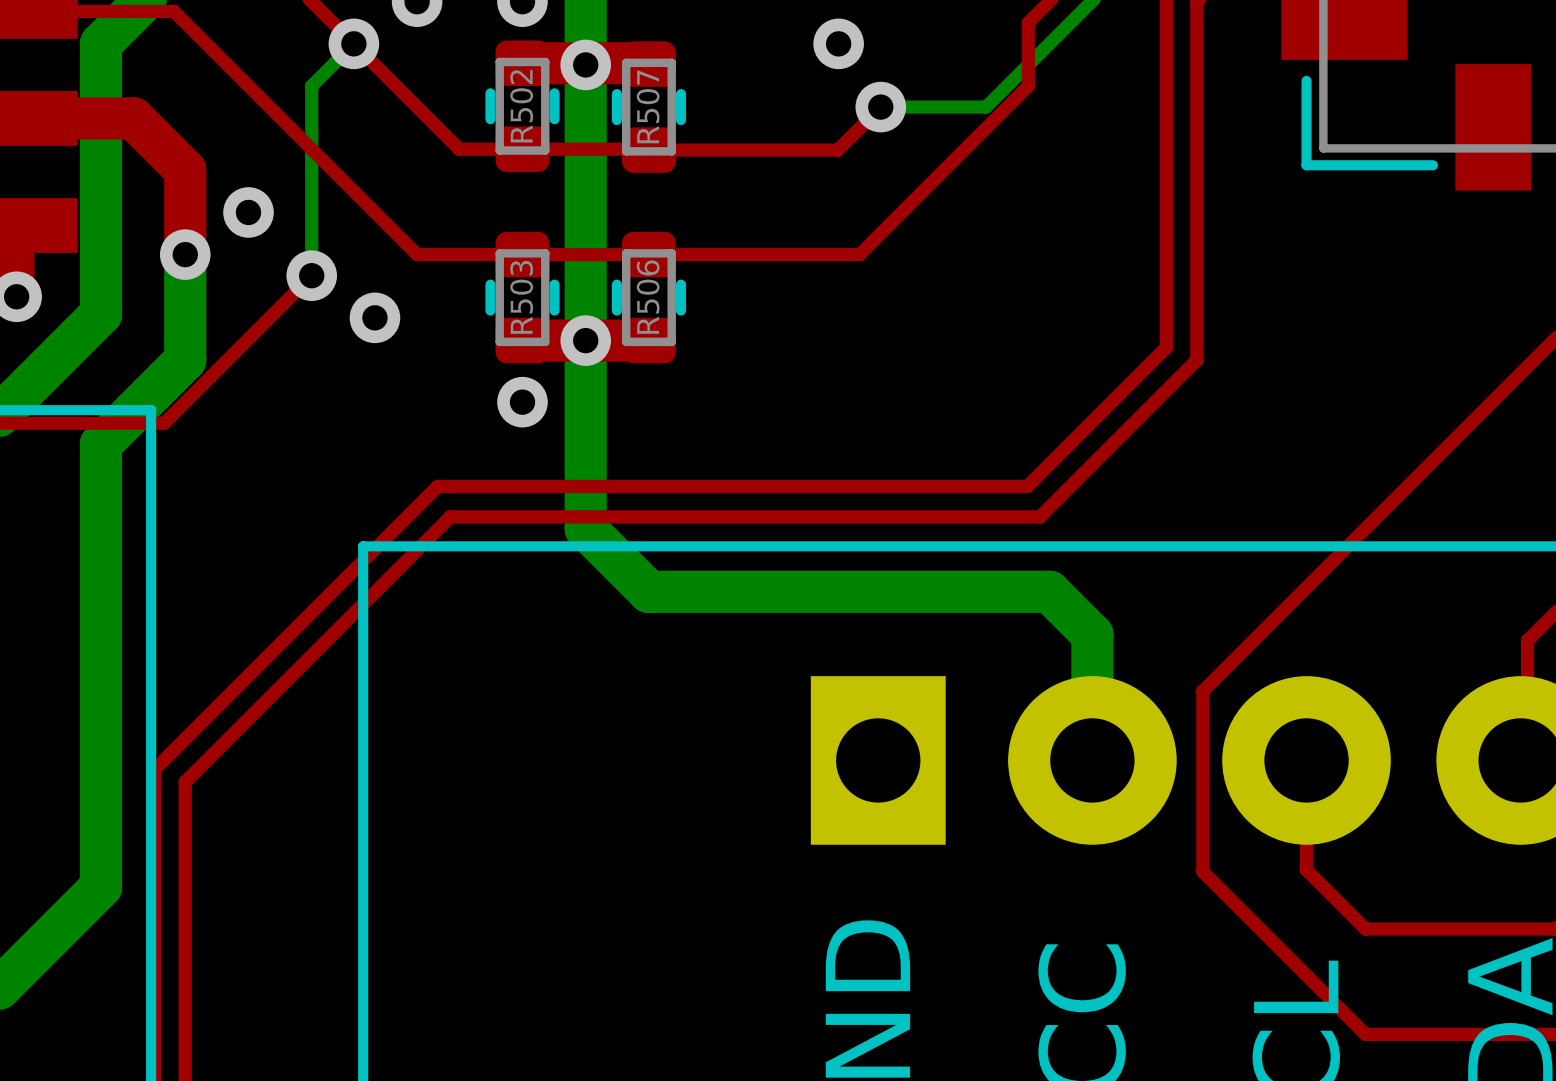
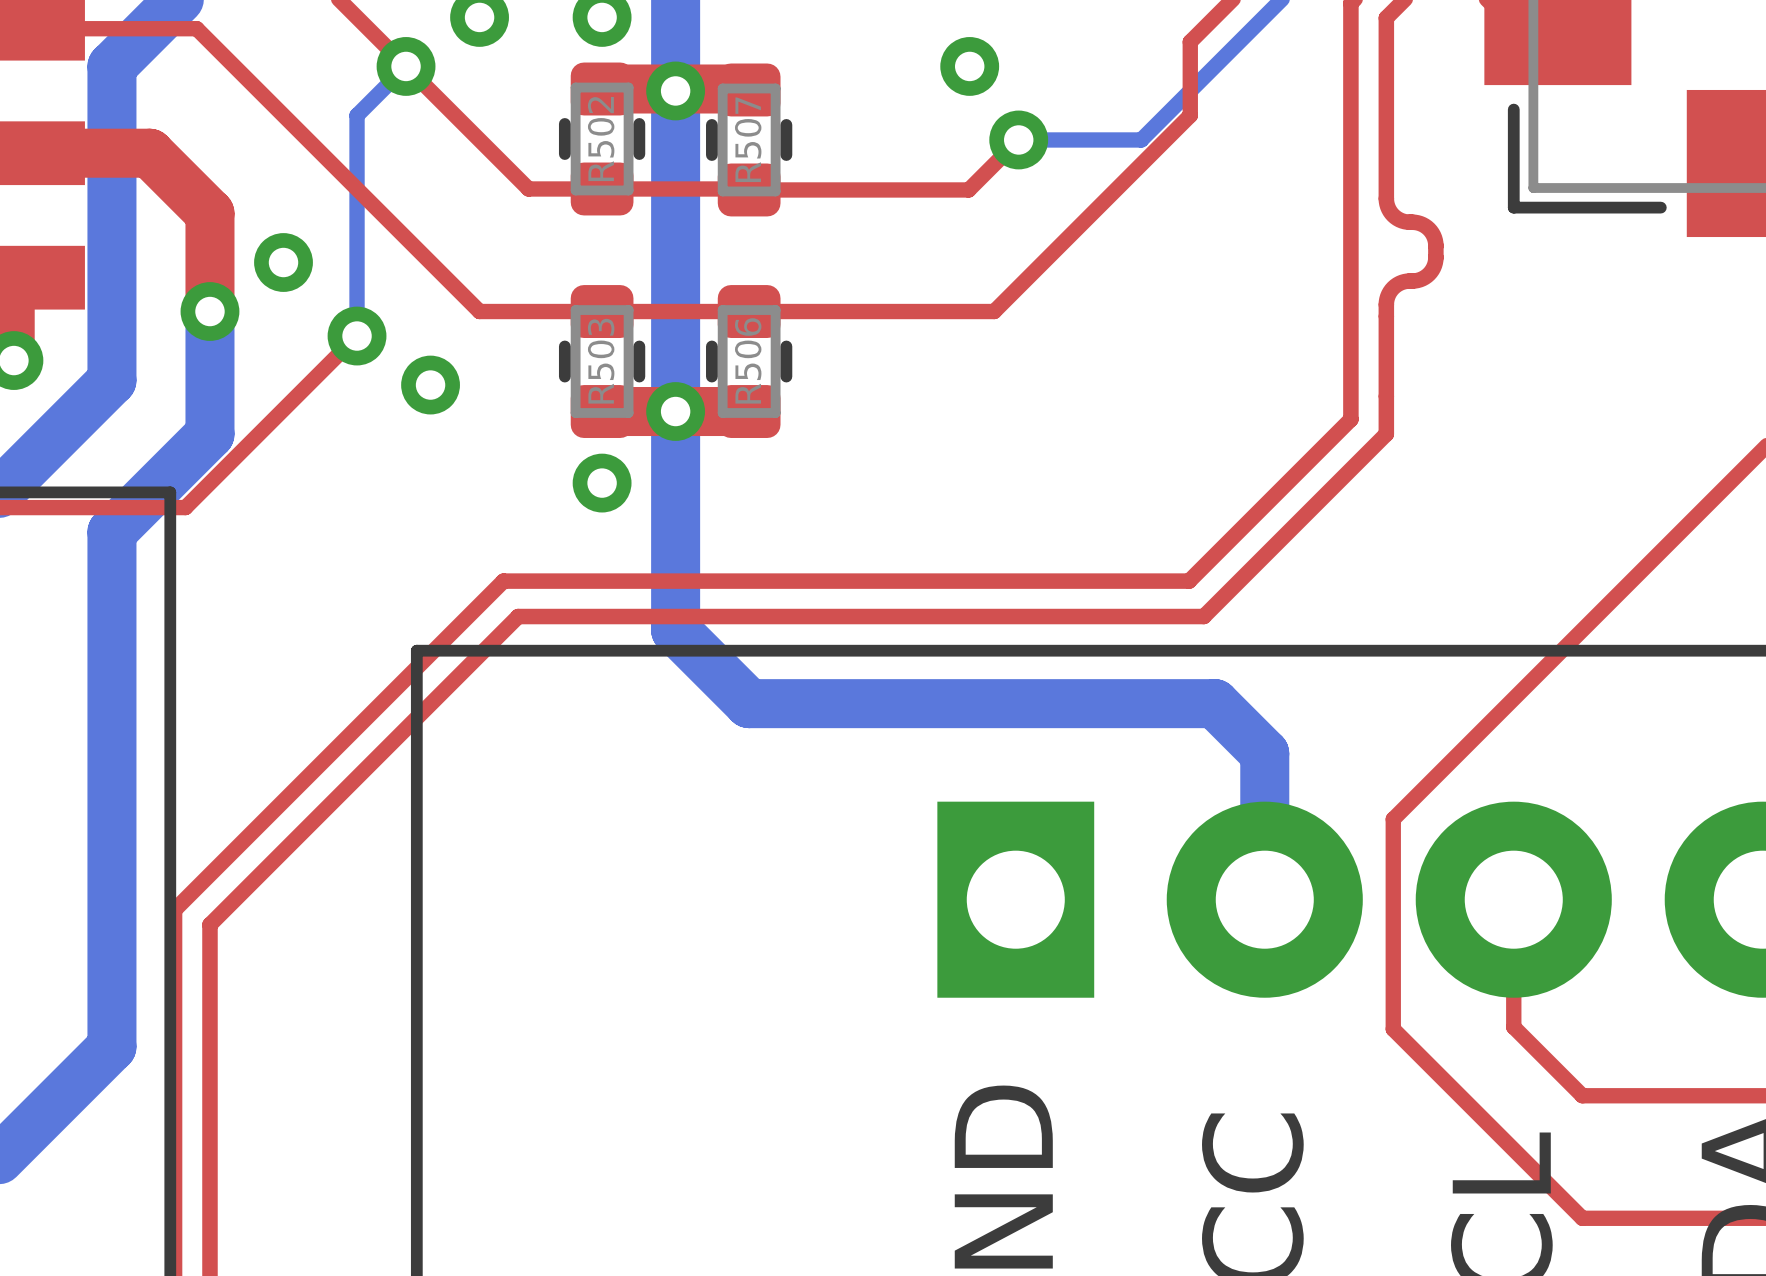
top track: (1196, 157) (1196, 248) -> (1386, 198) (1387, 206) (1393, 215) (1402, 220) (1417, 222) (1427, 227) (1433, 235) (1435, 245) (1435, 262) (1430, 272) (1420, 279) (1404, 281) (1395, 286) (1388, 294) (1386, 304)

